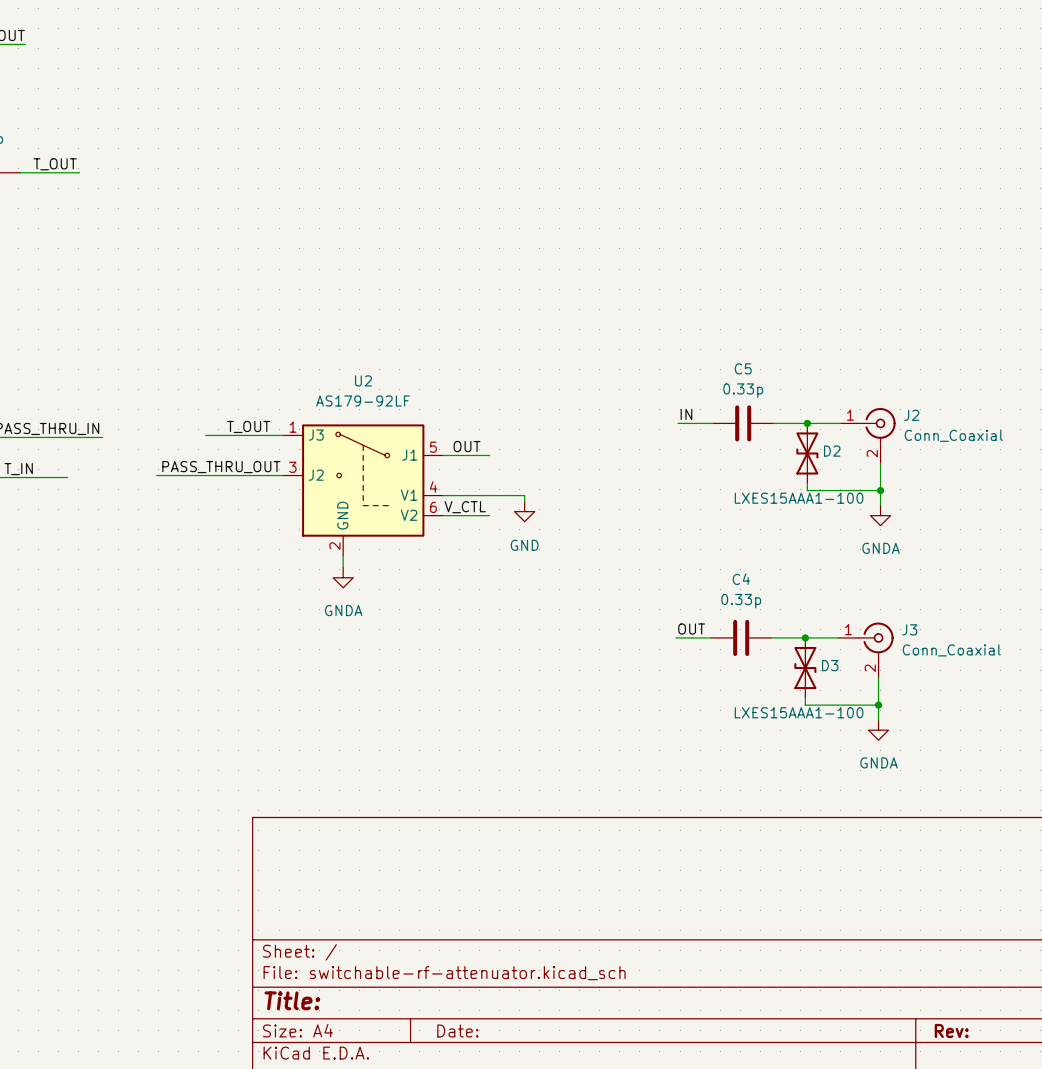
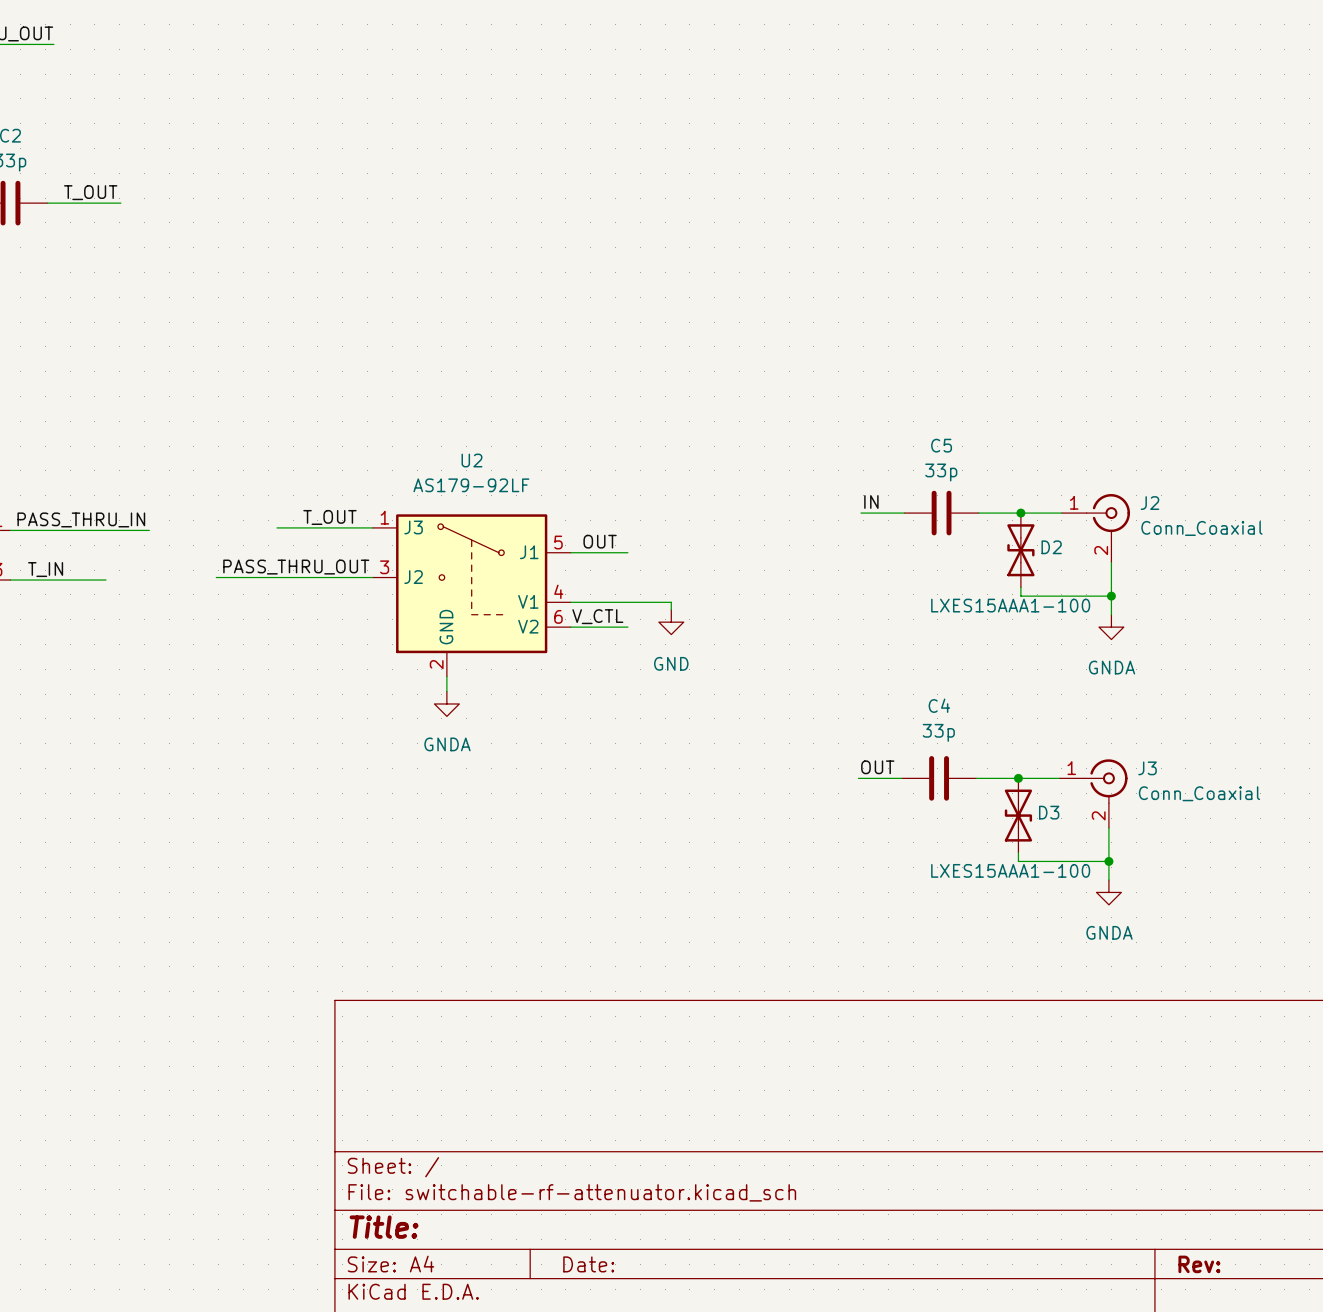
C5 value: 0.33p (743, 390) -> 33p (941, 472)
C4 value: 0.33p (741, 601) -> 33p (938, 732)

